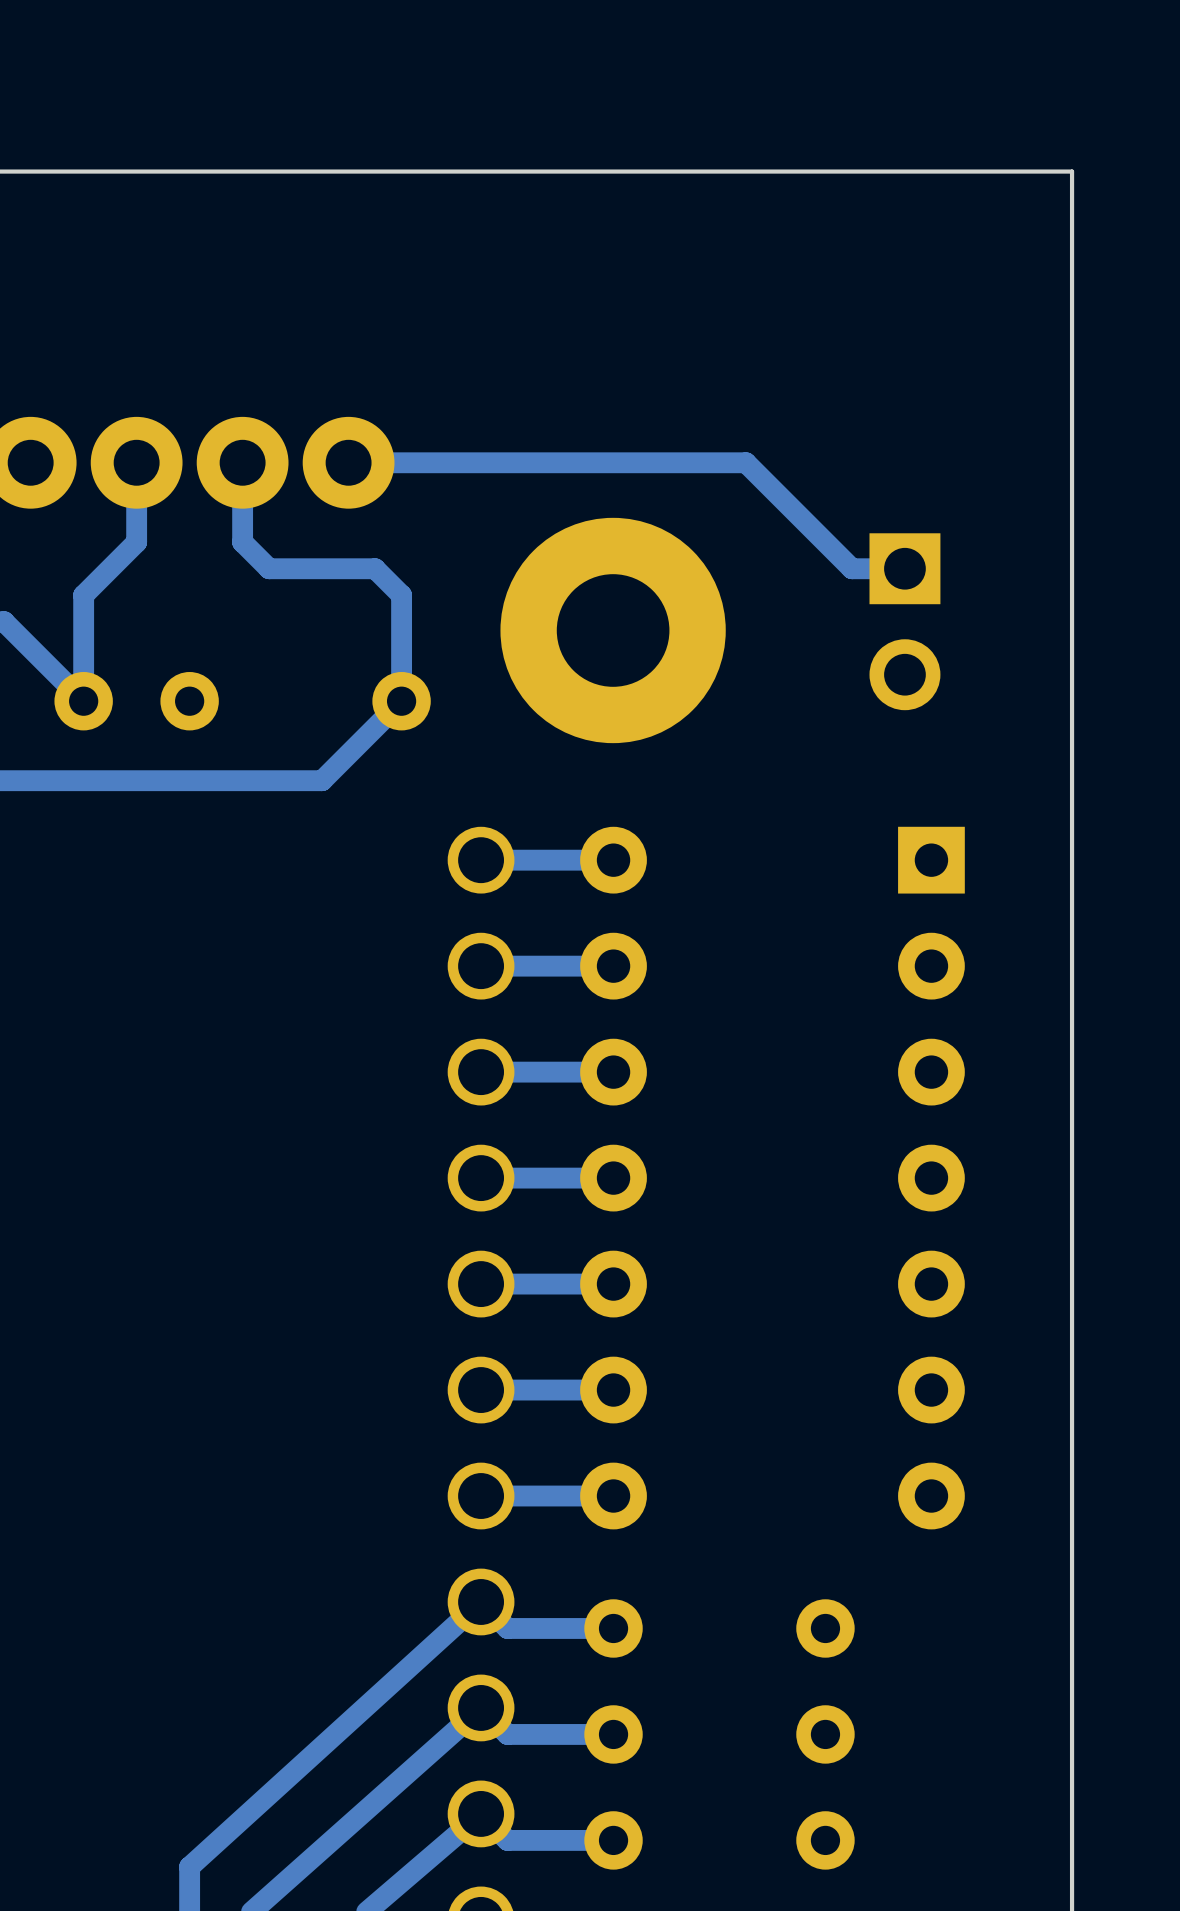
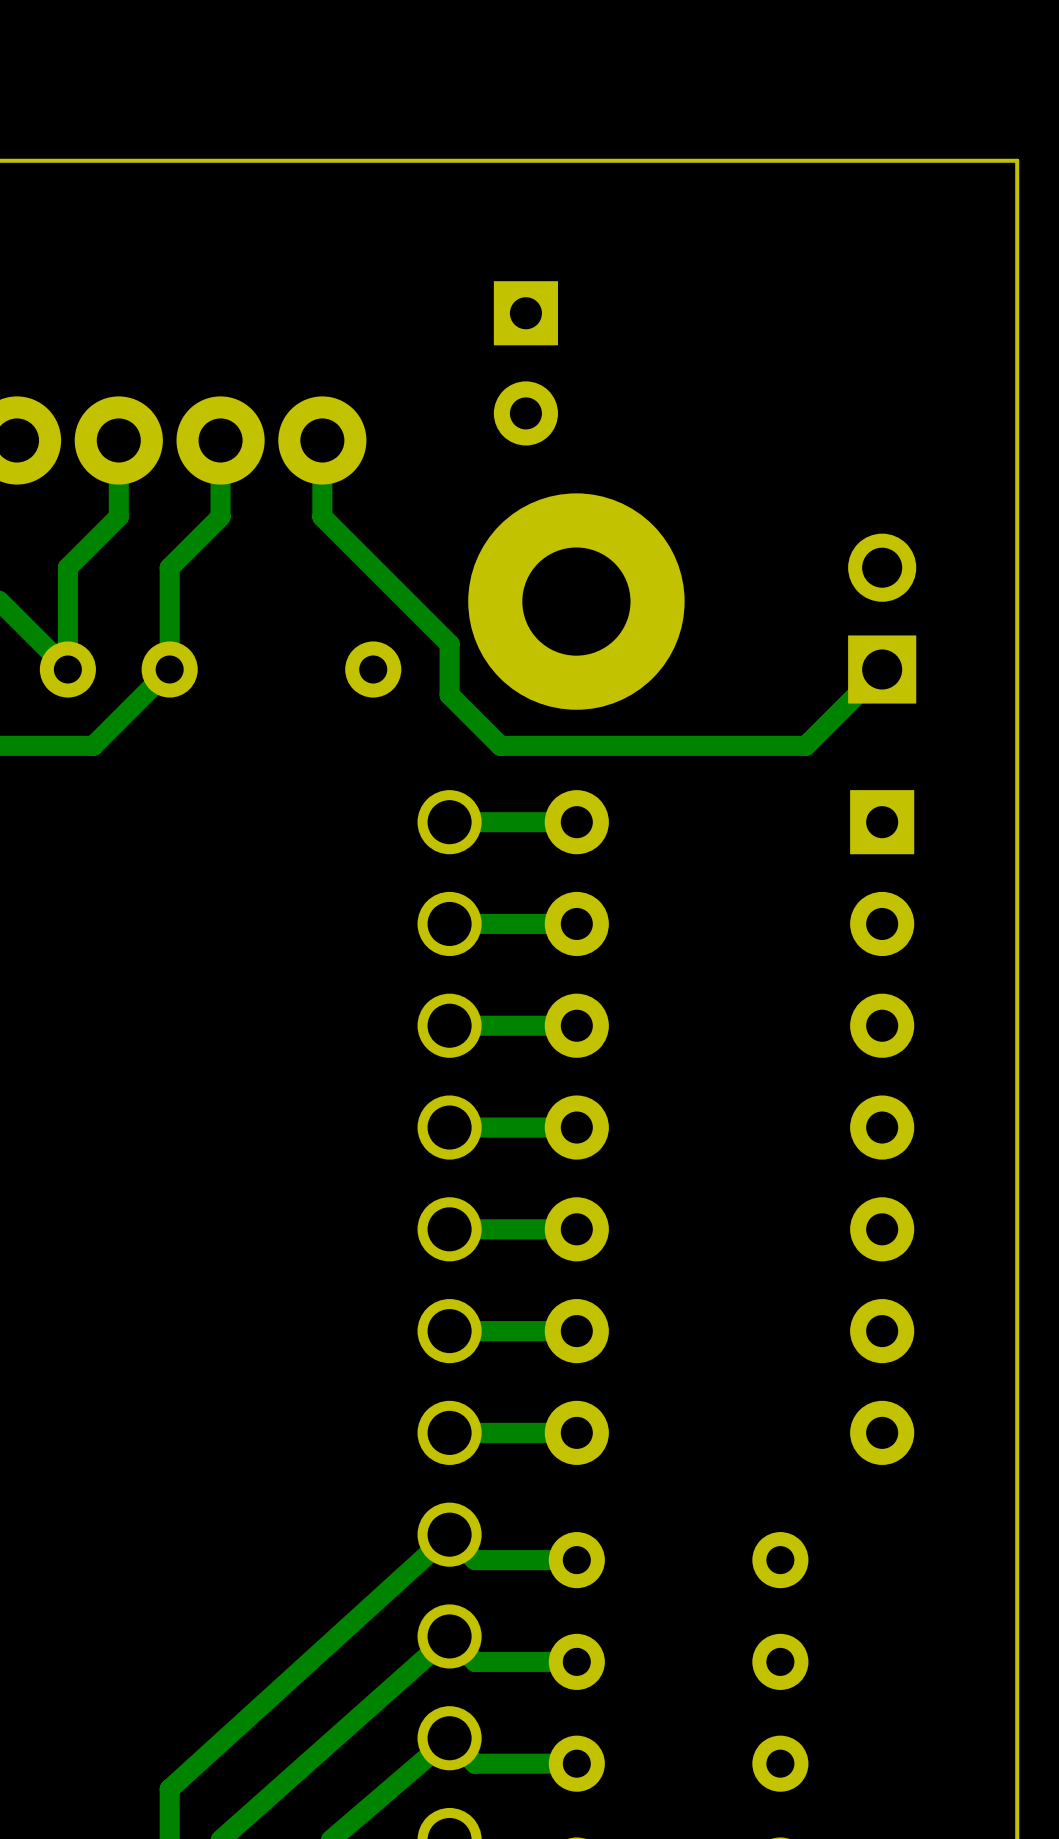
part: none -> (525, 363)
track: (348, 462) (745, 462) (851, 568) (904, 568) -> none
track: (242, 542) (269, 568) (375, 568) -> (322, 440) (322, 516) (347, 542)
track: (401, 595) (401, 701) (322, 780) (110, 780) -> (220, 516) (169, 567) (169, 669) (93, 745)
track: none -> (373, 567) (449, 644) (449, 694) (500, 745) (805, 745) (882, 669)
part rotation: 0° (904, 621) -> 180° (882, 618)

